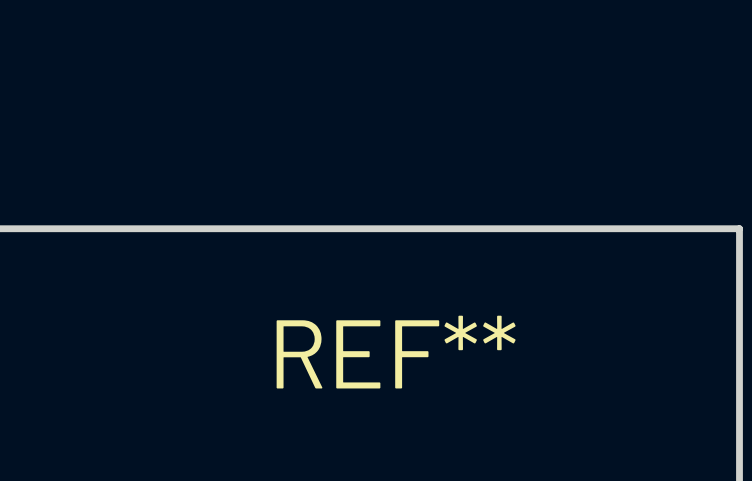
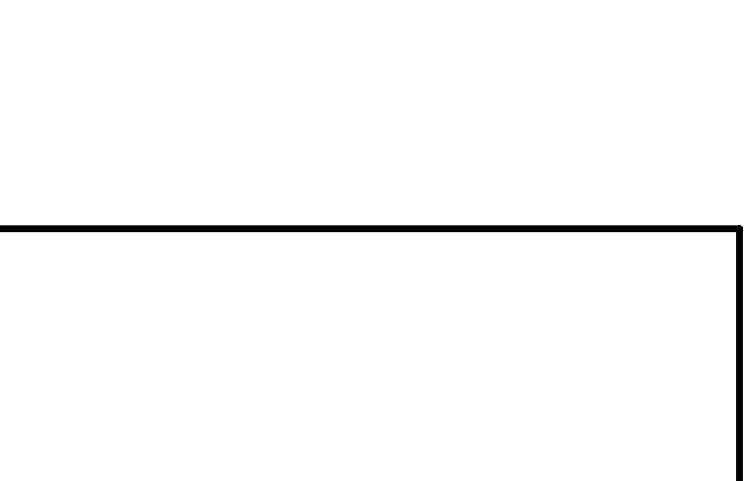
REF** name: REF** (396, 352) -> none

